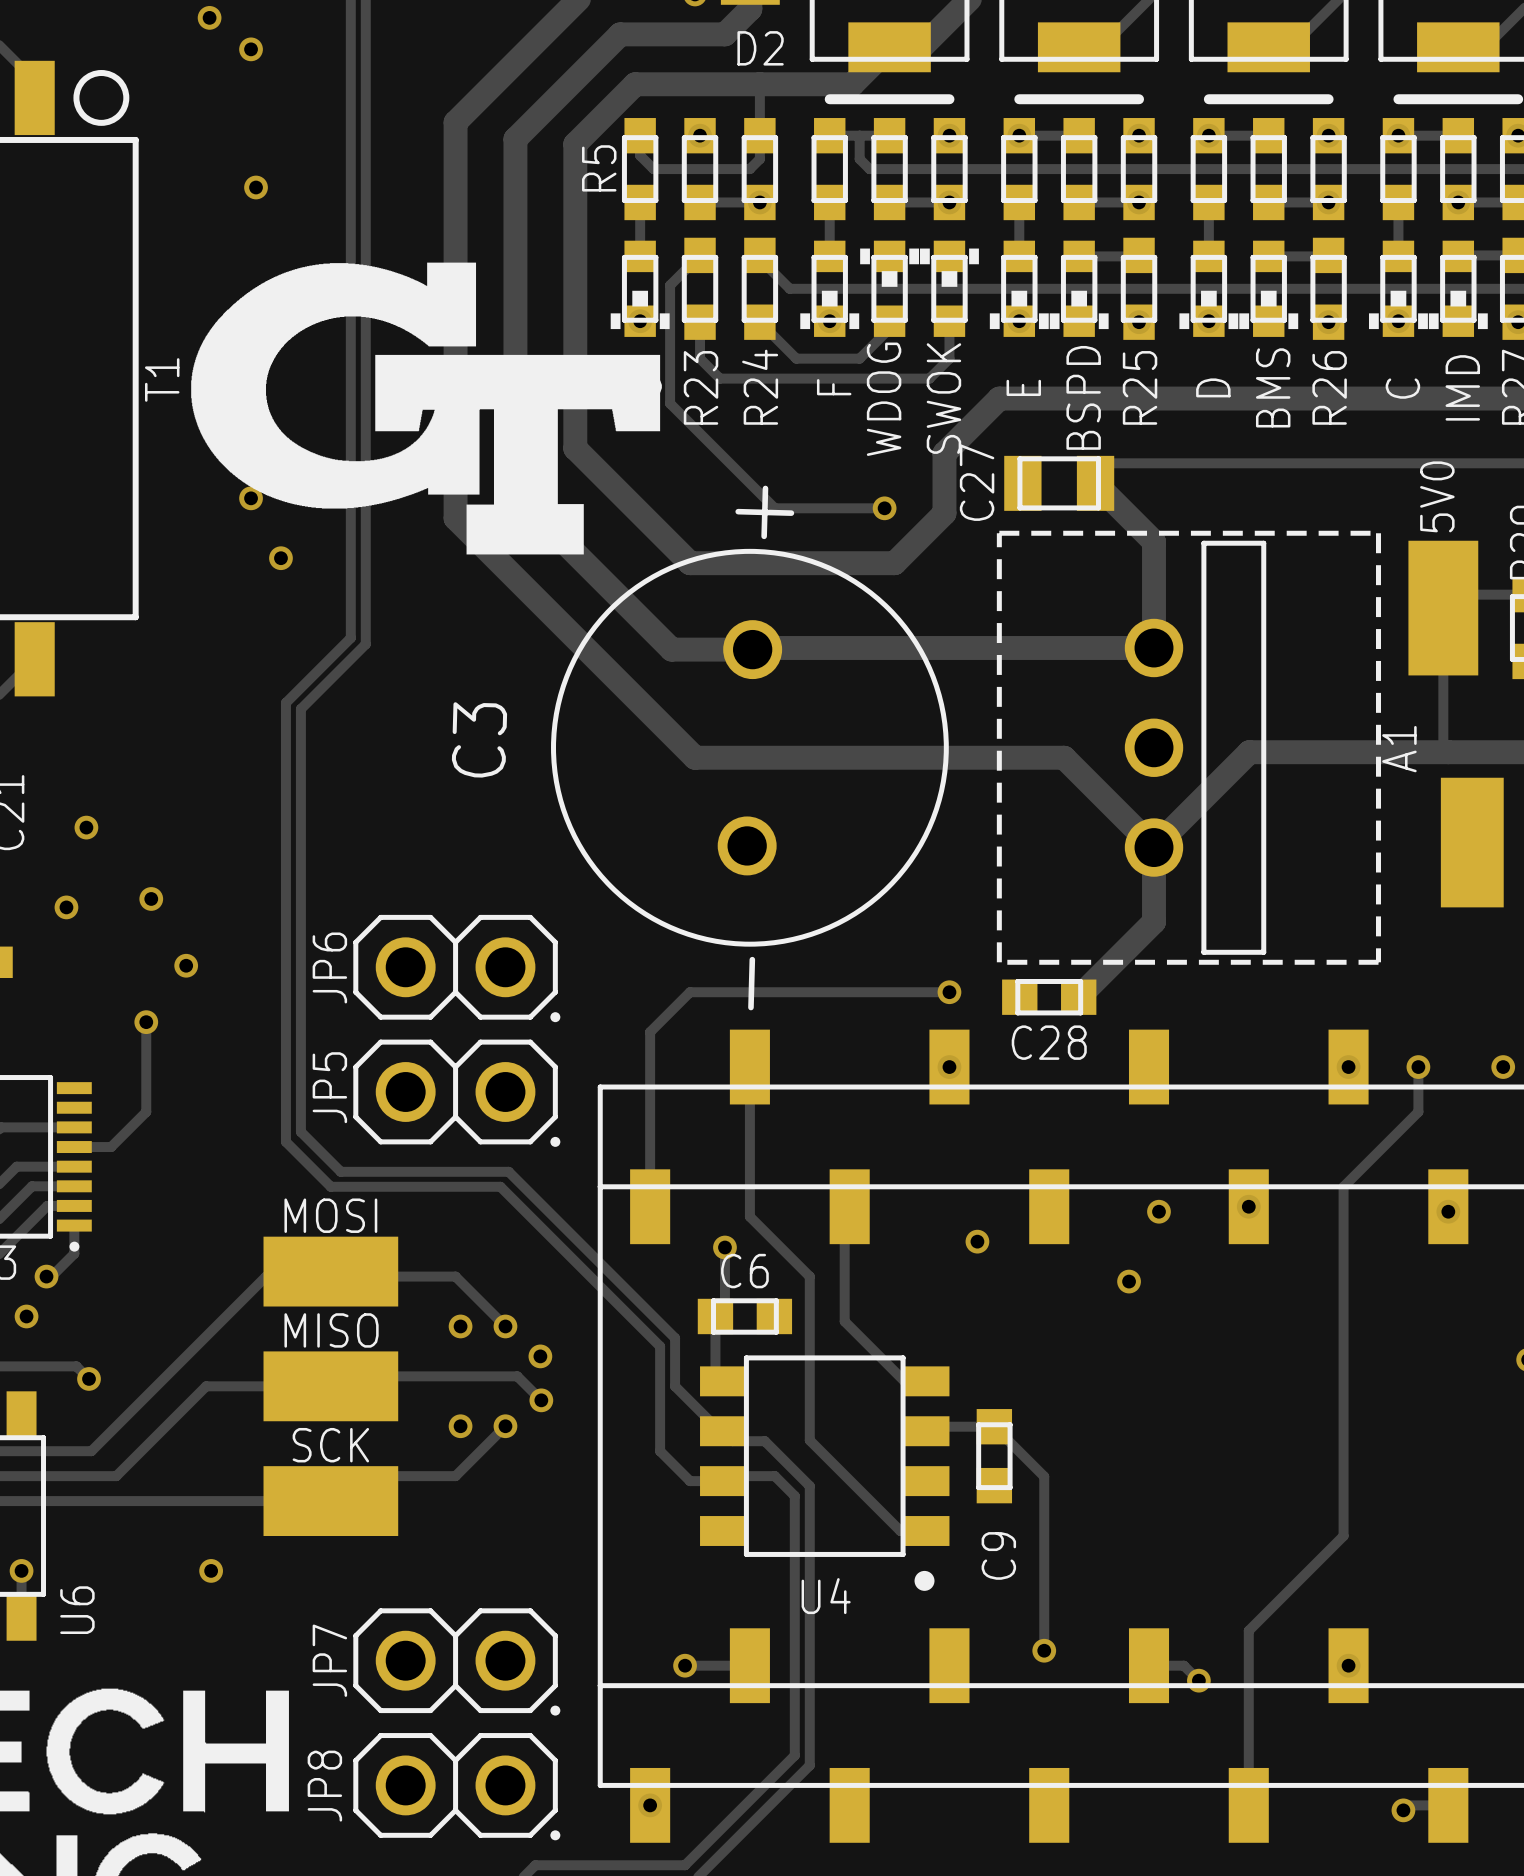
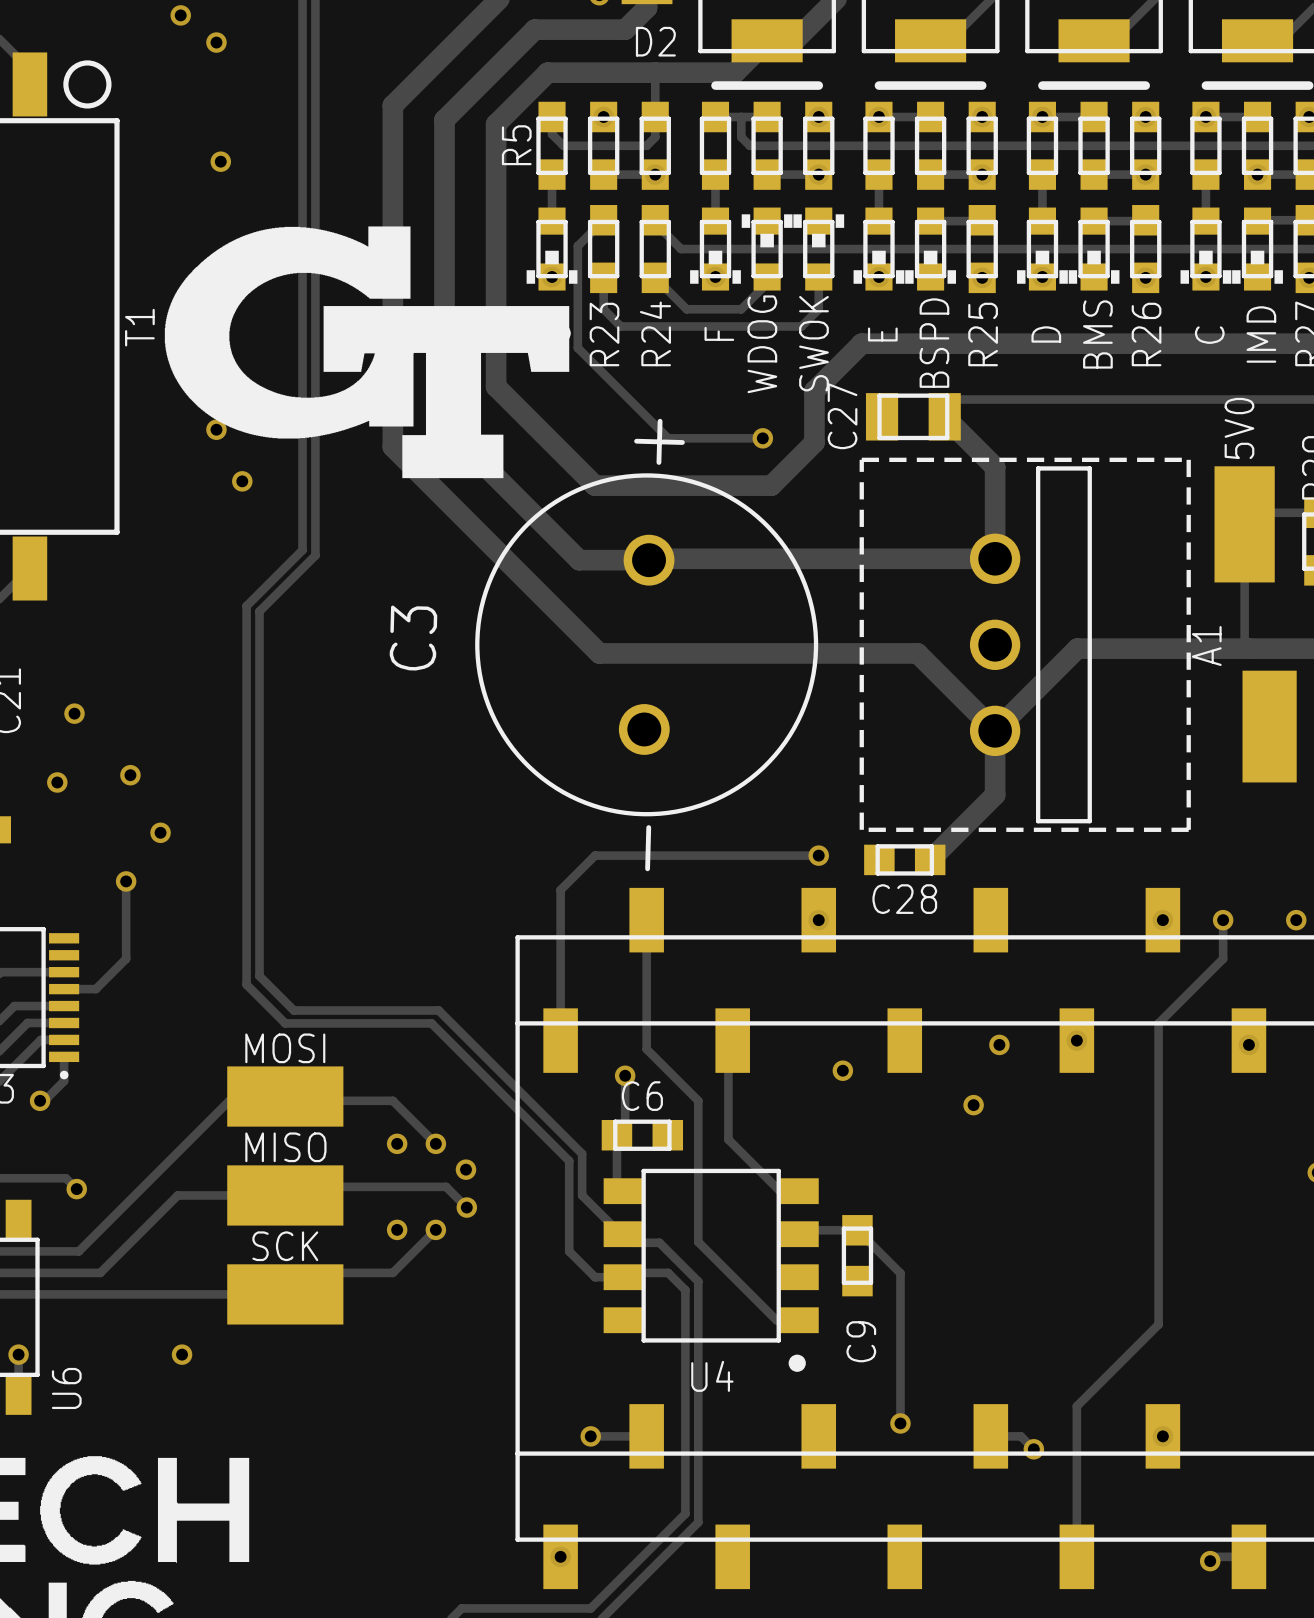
JP6: (456, 968) -> none
JP5: (456, 1093) -> none
via: (26, 1316) -> none
JP7: (456, 1661) -> none
JP8: (456, 1786) -> none

